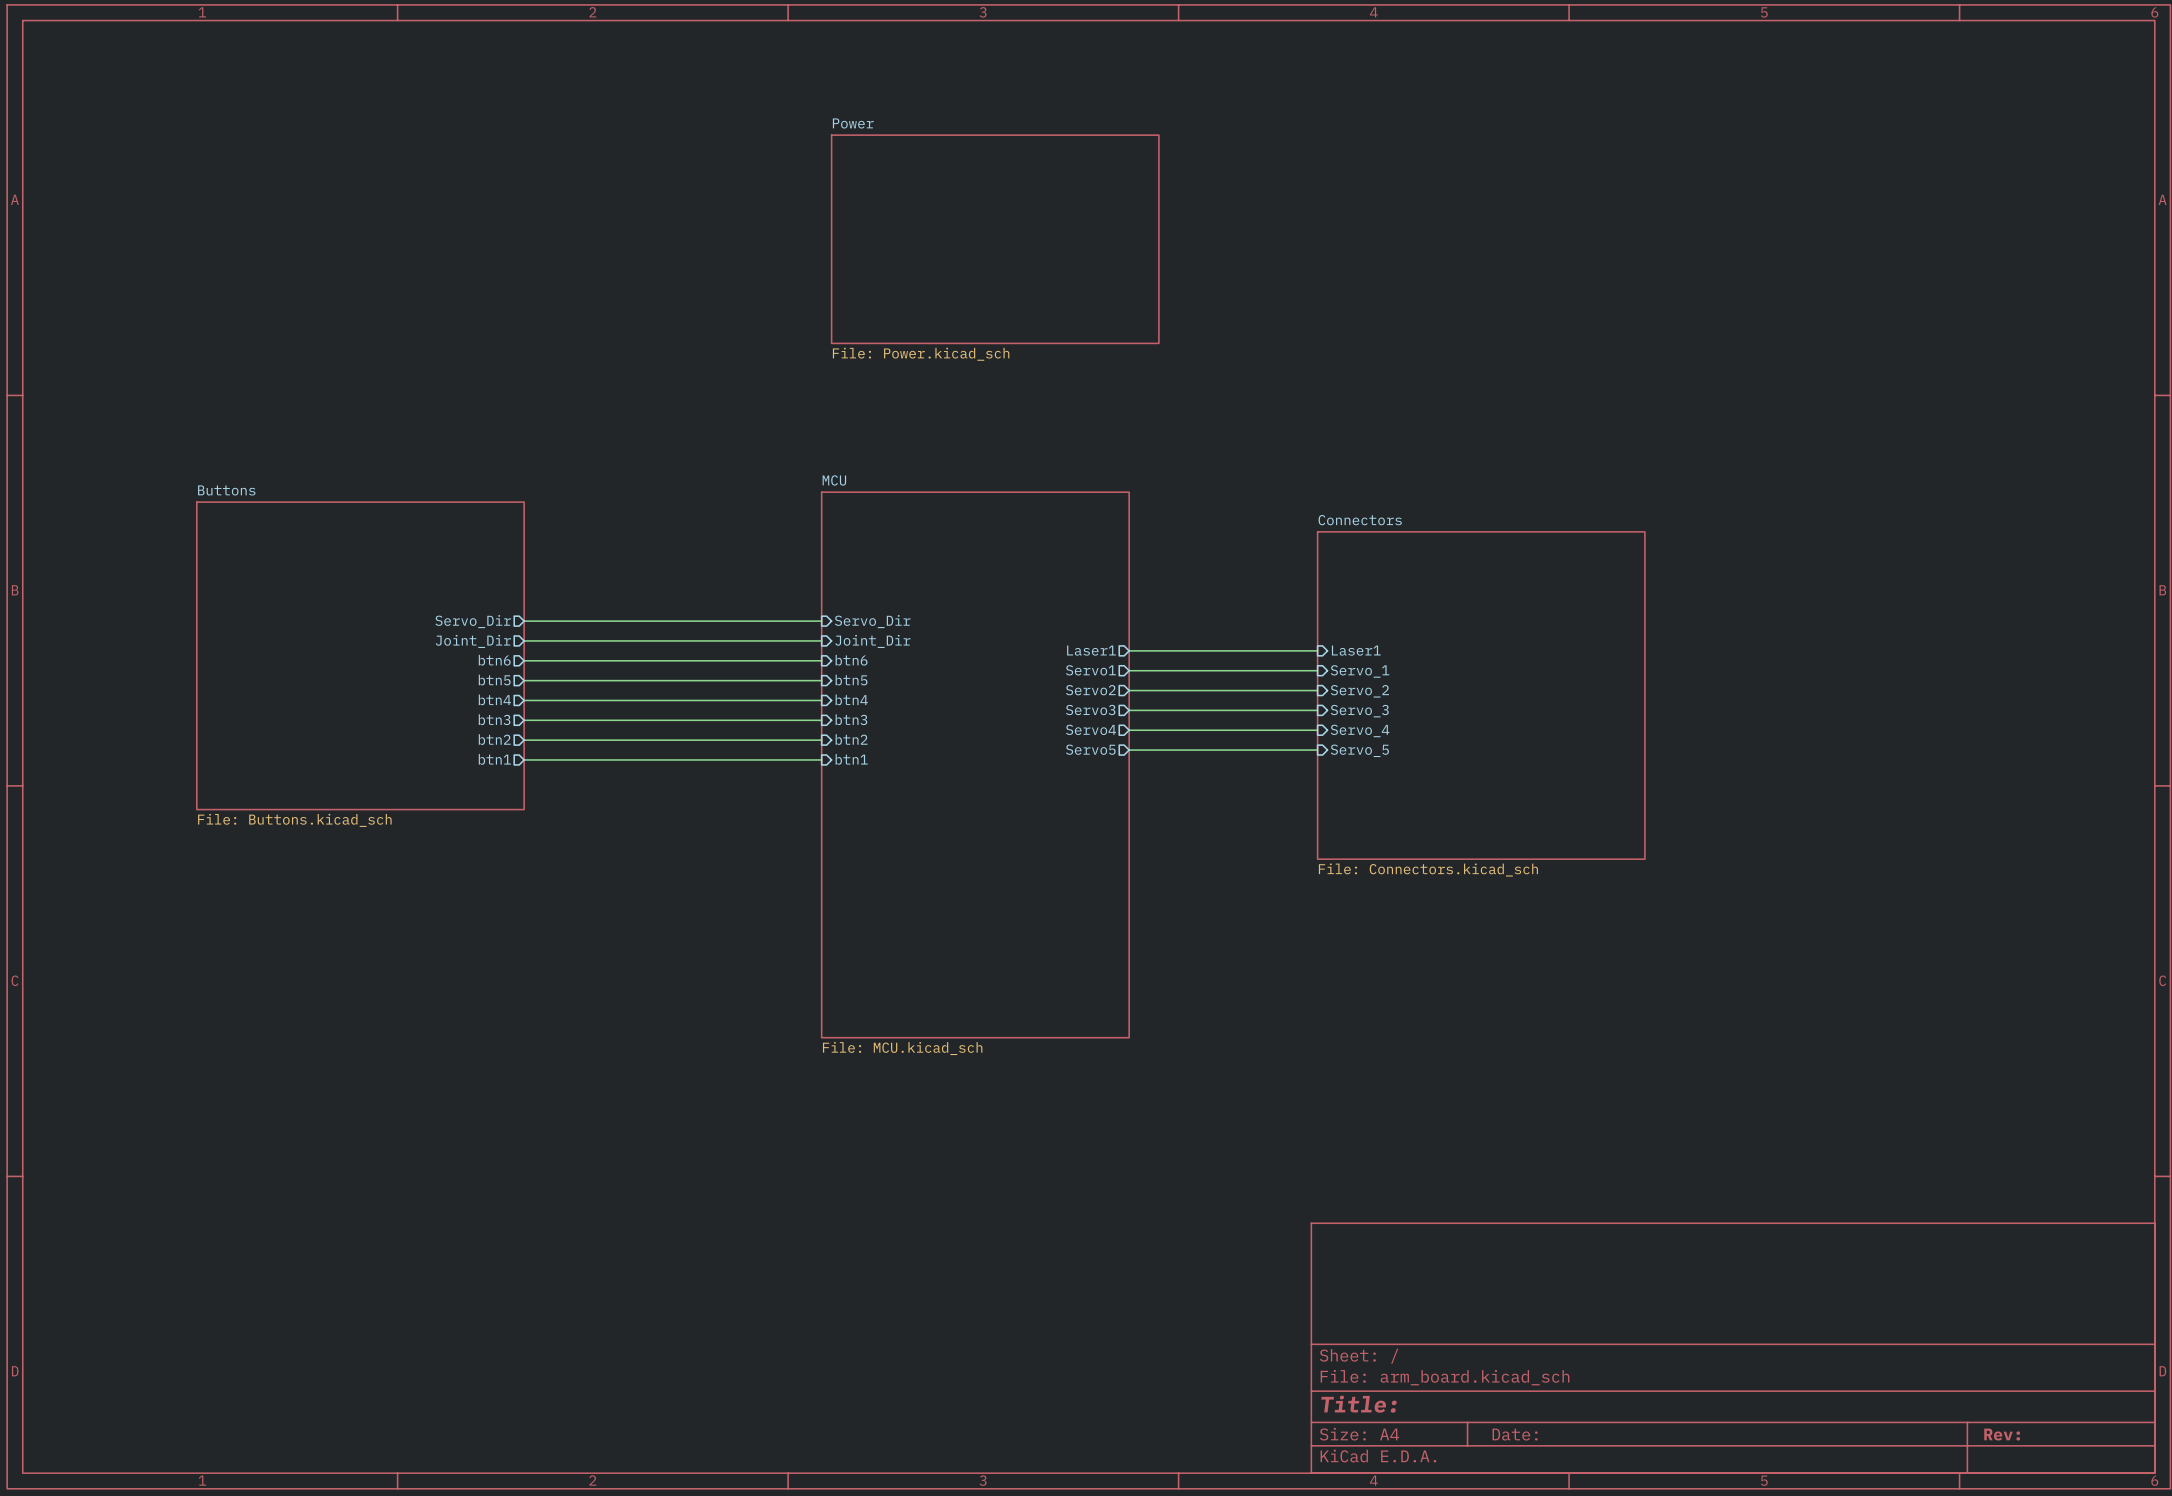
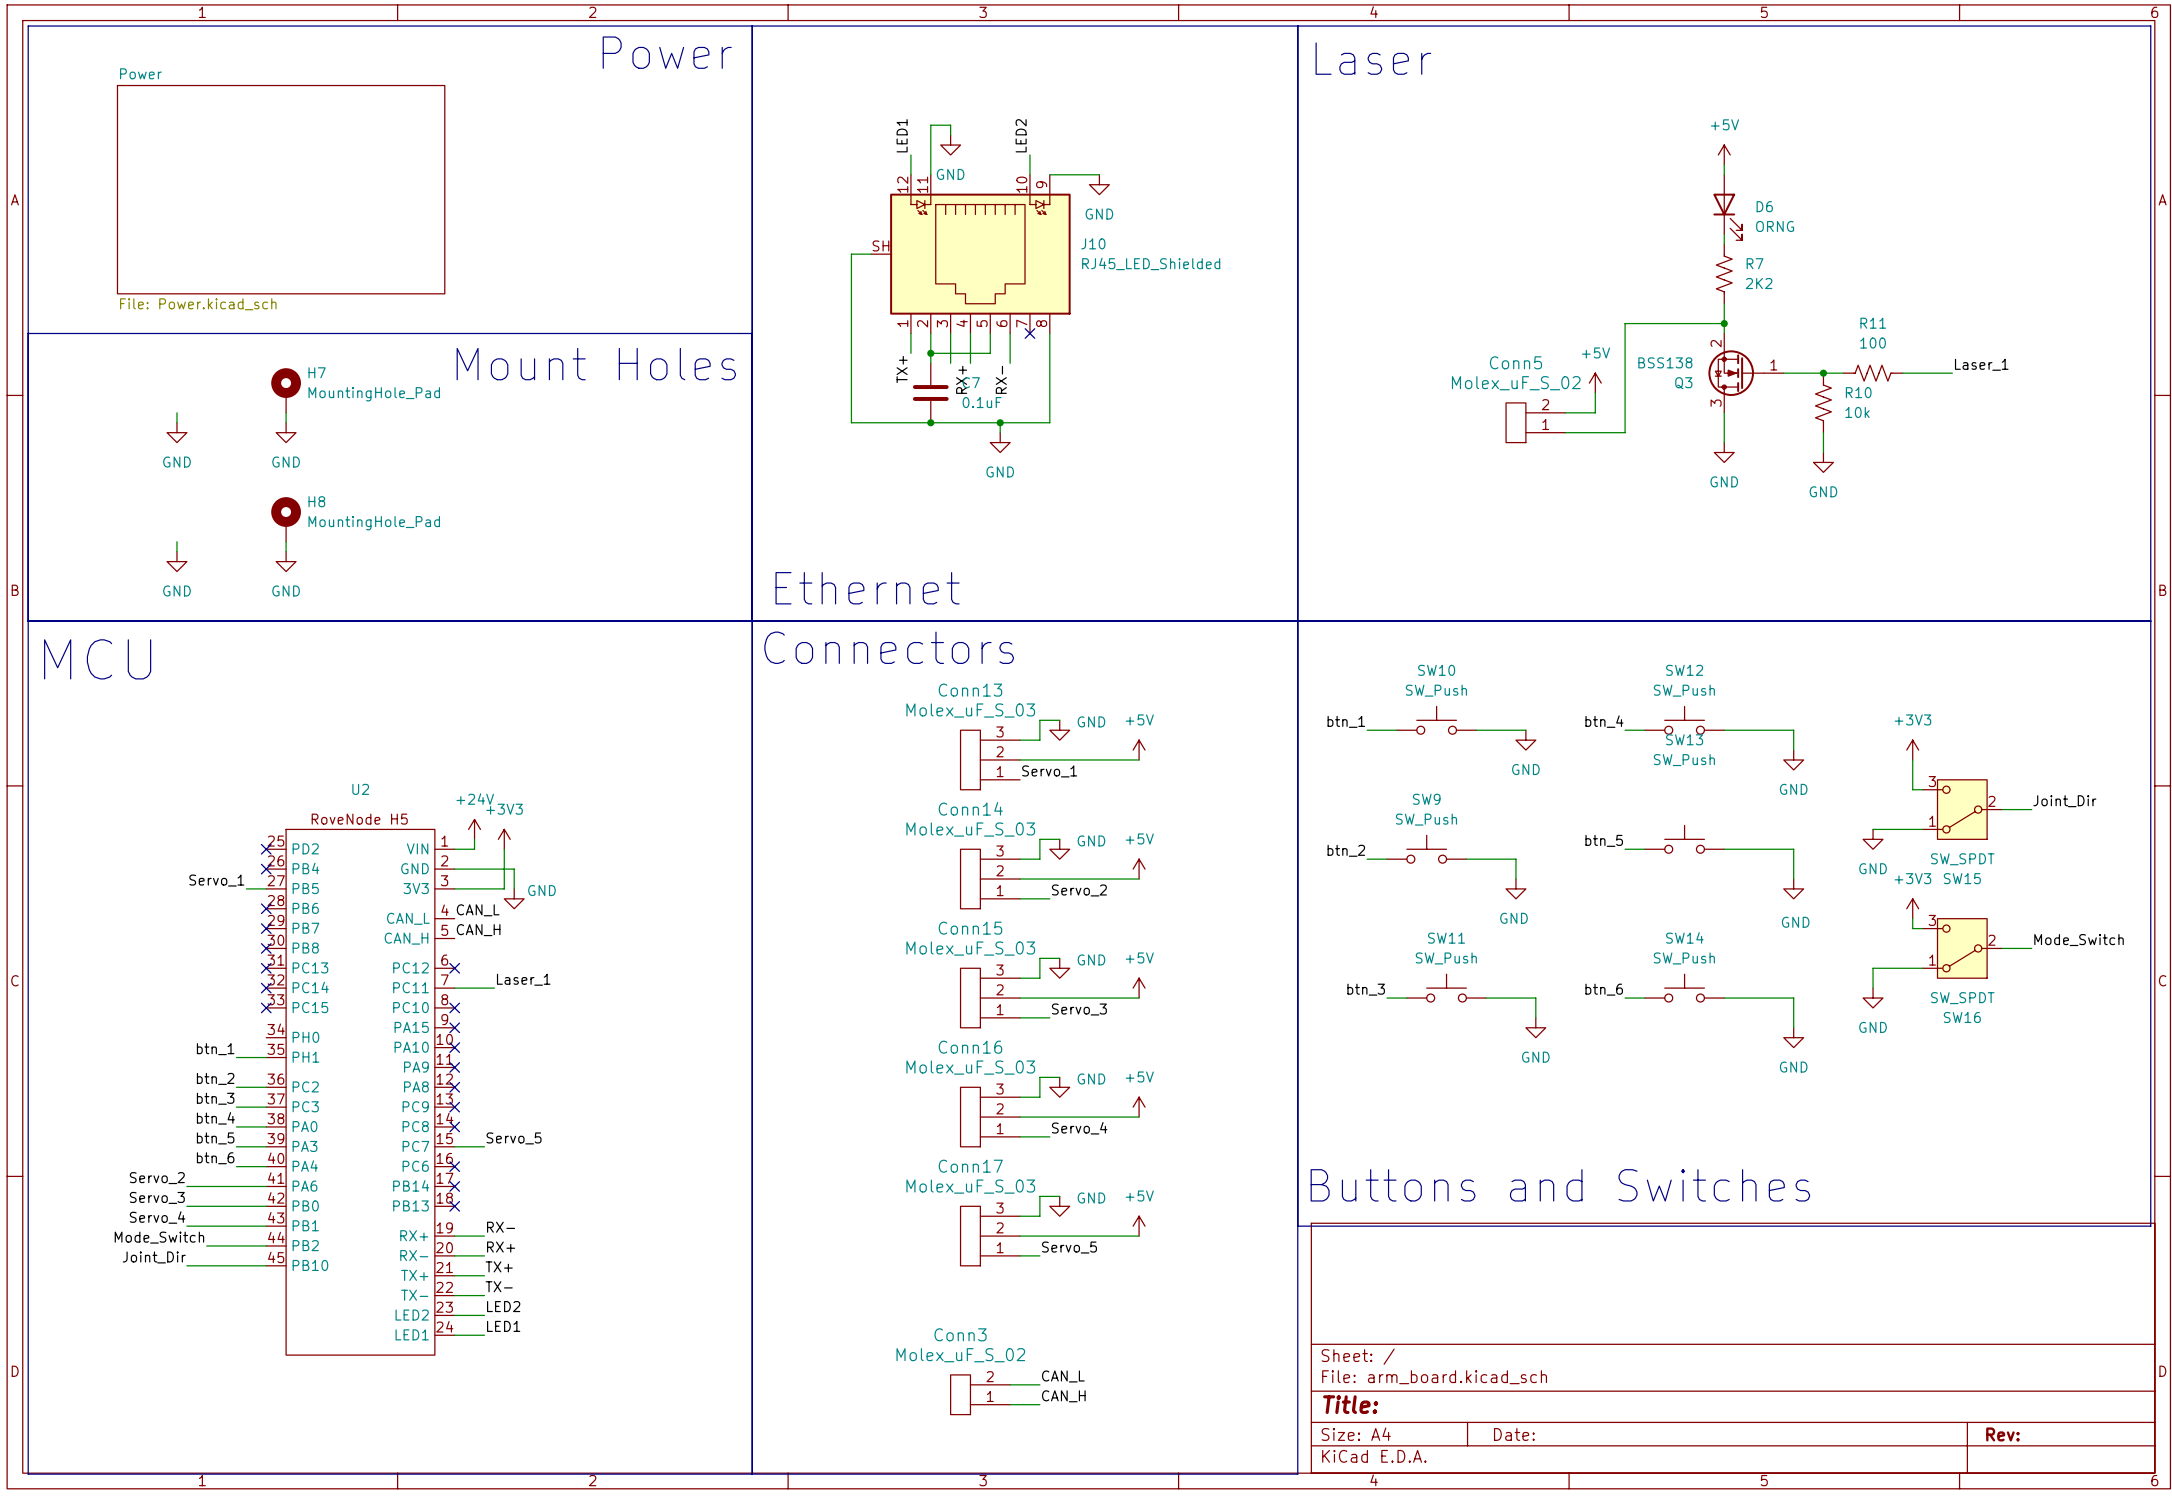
line: none -> (752, 26) (752, 1474)
line: none -> (1297, 26) (1297, 1474) (28, 1474) (28, 26) (2150, 26) (2150, 1226) (1297, 1226)
text: none -> Power (667, 52)
text: none -> Laser (1373, 58)
wire: none -> (950, 135) (950, 125) (930, 125) (930, 174)
label: none -> LED1 (902, 135)
label: none -> LED2 (1021, 135)
power symbol: none -> GND (950, 145)
wire: none -> (910, 154) (910, 174)
wire: none -> (1029, 154) (1029, 174)
power symbol: none -> +5V (1724, 154)
wire: none -> (1724, 164) (1724, 174)
wire: none -> (1049, 174) (1099, 174)
power symbol: none -> GND (1099, 184)
sheet Power: none -> File: Power.kicad_sch (281, 189)
D6: none -> ORNG (1727, 207)
wire: none -> (1724, 234) (1724, 244)
sheet Power: File: Power.kicad_sch (995, 239) -> none
wire: none -> (871, 254) (851, 254) (851, 422) (1049, 422) (1049, 333)
J10: none -> RJ45_LED_Shielded (970, 254)
R7: none -> 2K2 (1724, 273)
wire: none -> (1724, 303) (1724, 333)
wire: none -> (1724, 323) (1625, 323) (1625, 432) (1565, 432)
junction: none -> (1724, 323)
line: none -> (28, 333) (752, 333)
wire: none -> (910, 333) (910, 353)
wire: none -> (930, 333) (930, 363)
wire: none -> (950, 333) (950, 363)
wire: none -> (970, 333) (970, 363)
wire: none -> (990, 333) (990, 353) (930, 353)
wire: none -> (1010, 333) (1010, 363)
no-connect mark: none -> (1029, 333)
junction: none -> (930, 353)
text: none -> Mount Holes (596, 364)
label: none -> Laser_1 (1981, 364)
label: none -> TX+ (902, 369)
Q3: none -> BSS138 (1746, 373)
wire: none -> (1783, 373) (1843, 373)
junction: none -> (1823, 373)
R11: none -> 100 (1873, 373)
wire: none -> (1902, 373) (1952, 373)
label: none -> RX+ (961, 379)
label: none -> RX- (1001, 379)
power symbol: none -> +5V (1595, 383)
H7: none -> MountingHole_Pad (286, 390)
C7: none -> 0.1uF (930, 393)
wire: none -> (1595, 393) (1595, 412) (1565, 412)
R10: none -> 10k (1823, 402)
wire: none -> (176, 412) (176, 422)
wire: none -> (286, 412) (286, 422)
wire: none -> (1724, 412) (1724, 442)
junction: none -> (930, 422)
wire: none -> (1000, 422) (1000, 432)
junction: none -> (1000, 422)
Conn5: none -> Molex_uF_S_02 (1535, 422)
power symbol: none -> GND (176, 432)
power symbol: none -> GND (286, 432)
wire: none -> (1823, 432) (1823, 452)
power symbol: none -> GND (1000, 442)
power symbol: none -> GND (1724, 452)
power symbol: none -> GND (1823, 462)
H8: none -> MountingHole_Pad (286, 519)
wire: none -> (176, 541) (176, 551)
wire: none -> (286, 541) (286, 551)
power symbol: none -> GND (176, 561)
power symbol: none -> GND (286, 561)
text: none -> Ethernet (867, 588)
line: none -> (28, 621) (2150, 621)
sheet pin: Servo_Dir (473, 621) -> none
sheet pin: Servo_Dir (872, 621) -> none
wire: (524, 640) (821, 640) -> none
sheet pin: Joint_Dir (473, 641) -> none
sheet pin: Joint_Dir (872, 641) -> none
text: none -> Connectors (889, 647)
sheet pin: Laser1 (1091, 650) -> none
wire: (1129, 650) (1317, 650) -> none
sheet pin: Laser1 (1356, 650) -> none
sheet Buttons: File: Buttons.kicad_sch (360, 655) -> none
text: none -> MCU (97, 659)
sheet pin: btn6 (494, 660) -> none
wire: (524, 660) (821, 660) -> none
sheet pin: btn6 (851, 660) -> none
sheet pin: Servo1 (1090, 670) -> none
wire: (1129, 670) (1317, 670) -> none
sheet pin: Servo_1 (1360, 671) -> none
sheet pin: btn5 (494, 680) -> none
wire: (524, 680) (821, 680) -> none
sheet pin: btn5 (851, 680) -> none
sheet pin: Servo2 (1090, 690) -> none
wire: (1129, 690) (1317, 690) -> none
sheet pin: Servo_2 (1359, 691) -> none
sheet Connectors: File: Connectors.kicad_sch (1481, 695) -> none
sheet pin: btn4 (494, 699) -> none
sheet pin: btn4 (851, 699) -> none
wire: (524, 700) (821, 700) -> none
sheet pin: Servo3 (1090, 710) -> none
wire: (1129, 710) (1317, 710) -> none
sheet pin: Servo_3 (1359, 711) -> none
sheet pin: btn3 (494, 719) -> none
sheet pin: btn3 (851, 719) -> none
wire: (524, 720) (821, 720) -> none
wire: none -> (1059, 720) (1039, 720) (1039, 740) (1020, 740)
SW10: none -> SW_Push (1436, 720)
SW12: none -> SW_Push (1684, 720)
label: none -> btn_1 (1346, 721)
label: none -> btn_4 (1604, 721)
sheet pin: Servo4 (1091, 729) -> none
power symbol: none -> GND (1059, 730)
wire: (1129, 730) (1317, 730) -> none
sheet pin: Servo_4 (1360, 730) -> none
wire: none -> (1367, 730) (1396, 730)
wire: none -> (1476, 730) (1525, 730)
wire: none -> (1625, 730) (1644, 730)
wire: none -> (1724, 730) (1793, 730) (1793, 750)
sheet pin: btn2 (494, 739) -> none
sheet pin: btn2 (851, 739) -> none
wire: (524, 740) (821, 740) -> none
power symbol: none -> GND (1525, 740)
sheet pin: Servo5 (1090, 749) -> none
wire: (1129, 750) (1317, 750) -> none
power symbol: none -> +5V (1139, 750)
sheet pin: Servo_5 (1359, 750) -> none
power symbol: none -> +3V3 (1912, 750)
sheet pin: btn1 (494, 759) -> none
wire: (524, 759) (821, 759) -> none
sheet pin: btn1 (851, 759) -> none
Conn13: none -> Molex_uF_S_03 (990, 759)
wire: none -> (1020, 759) (1139, 759)
power symbol: none -> GND (1793, 759)
wire: none -> (1912, 759) (1912, 789) (1922, 789)
sheet MCU: File: MCU.kicad_sch (975, 764) -> none
label: none -> Servo_1 (1049, 771)
label: none -> Joint_Dir (2064, 801)
SW15: none -> SW_SPDT (1962, 809)
wire: none -> (2001, 809) (2031, 809)
power symbol: none -> +24V (474, 829)
wire: none -> (1873, 829) (1922, 829)
wire: none -> (474, 839) (474, 849) (454, 849)
power symbol: none -> +3V3 (504, 839)
wire: none -> (1059, 839) (1039, 839) (1039, 859) (1020, 859)
SW13: none -> SW_Push (1684, 839)
power symbol: none -> GND (1873, 839)
label: none -> btn_5 (1604, 840)
no-connect mark: none -> (266, 849)
wire: none -> (504, 849) (504, 888) (454, 888)
power symbol: none -> GND (1059, 849)
SW9: none -> SW_Push (1426, 849)
wire: none -> (1625, 849) (1644, 849)
wire: none -> (1724, 849) (1793, 849) (1793, 879)
label: none -> btn_2 (1346, 850)
no-connect mark: none -> (266, 869)
wire: none -> (454, 869) (514, 869) (514, 888)
power symbol: none -> +5V (1139, 869)
Conn14: none -> Molex_uF_S_03 (990, 879)
wire: none -> (1020, 879) (1139, 879)
label: none -> Servo_1 (216, 880)
wire: none -> (246, 888) (266, 888)
power symbol: none -> GND (1515, 888)
power symbol: none -> GND (1793, 888)
label: none -> Servo_2 (1079, 890)
power symbol: none -> GND (514, 898)
wire: none -> (1020, 898) (1049, 898)
no-connect mark: none -> (266, 908)
power symbol: none -> +3V3 (1912, 908)
label: none -> CAN_L (478, 910)
wire: none -> (1912, 918) (1912, 928) (1922, 928)
no-connect mark: none -> (266, 928)
label: none -> CAN_H (478, 930)
label: none -> Mode_Switch (2079, 940)
no-connect mark: none -> (266, 948)
SW16: none -> SW_SPDT (1962, 948)
wire: none -> (2001, 948) (2031, 948)
wire: none -> (1059, 958) (1039, 958) (1039, 978) (1020, 978)
no-connect mark: none -> (266, 968)
no-connect mark: none -> (454, 968)
power symbol: none -> GND (1059, 968)
wire: none -> (1922, 968) (1873, 968) (1873, 988)
label: none -> Laser_1 (523, 979)
no-connect mark: none -> (266, 988)
wire: none -> (454, 988) (494, 988)
power symbol: none -> +5V (1139, 988)
SW11: none -> SW_Push (1446, 988)
SW14: none -> SW_Push (1684, 988)
label: none -> btn_3 (1366, 989)
label: none -> btn_6 (1604, 989)
Conn15: none -> Molex_uF_S_03 (990, 998)
wire: none -> (1020, 998) (1139, 998)
wire: none -> (1387, 998) (1406, 998)
wire: none -> (1486, 998) (1535, 998) (1535, 1017)
wire: none -> (1625, 998) (1644, 998)
wire: none -> (1724, 998) (1793, 998) (1793, 1027)
power symbol: none -> GND (1873, 998)
no-connect mark: none -> (266, 1007)
no-connect mark: none -> (454, 1007)
label: none -> Servo_3 (1079, 1009)
wire: none -> (1020, 1017) (1049, 1017)
no-connect mark: none -> (454, 1027)
power symbol: none -> GND (1535, 1027)
power symbol: none -> GND (1793, 1037)
no-connect mark: none -> (454, 1047)
label: none -> btn_1 (215, 1049)
wire: none -> (236, 1057) (266, 1057)
no-connect mark: none -> (454, 1067)
wire: none -> (1059, 1077) (1039, 1077) (1039, 1097) (1020, 1097)
label: none -> btn_2 (215, 1078)
wire: none -> (236, 1087) (266, 1087)
no-connect mark: none -> (454, 1087)
power symbol: none -> GND (1059, 1087)
U2: none -> (360, 1092)
label: none -> btn_3 (215, 1098)
wire: none -> (236, 1107) (266, 1107)
no-connect mark: none -> (454, 1107)
power symbol: none -> +5V (1139, 1107)
Conn16: none -> Molex_uF_S_03 (990, 1117)
wire: none -> (1020, 1117) (1139, 1117)
label: none -> btn_4 (215, 1118)
wire: none -> (236, 1126) (266, 1126)
no-connect mark: none -> (454, 1126)
label: none -> Servo_4 (1079, 1128)
wire: none -> (1020, 1136) (1049, 1136)
label: none -> btn_5 (215, 1138)
label: none -> Servo_5 (514, 1138)
wire: none -> (236, 1146) (266, 1146)
wire: none -> (454, 1146) (484, 1146)
label: none -> btn_6 (215, 1158)
wire: none -> (236, 1166) (266, 1166)
no-connect mark: none -> (454, 1166)
label: none -> Servo_2 (157, 1178)
text: none -> Buttons and Switches (1560, 1185)
wire: none -> (186, 1186) (266, 1186)
no-connect mark: none -> (454, 1186)
wire: none -> (1059, 1196) (1039, 1196) (1039, 1216) (1020, 1216)
label: none -> Servo_3 (157, 1197)
wire: none -> (186, 1206) (266, 1206)
no-connect mark: none -> (454, 1206)
power symbol: none -> GND (1059, 1206)
label: none -> Servo_4 (157, 1217)
wire: none -> (186, 1226) (266, 1226)
power symbol: none -> +5V (1139, 1226)
label: none -> RX- (501, 1227)
wire: none -> (454, 1236) (484, 1236)
Conn17: none -> Molex_uF_S_03 (990, 1236)
wire: none -> (1020, 1236) (1139, 1236)
label: none -> Mode_Switch (159, 1237)
wire: none -> (206, 1245) (266, 1245)
label: none -> RX+ (501, 1247)
label: none -> Servo_5 (1069, 1247)
wire: none -> (454, 1255) (484, 1255)
wire: none -> (1020, 1255) (1039, 1255)
label: none -> Joint_Dir (154, 1257)
wire: none -> (186, 1265) (266, 1265)
label: none -> TX+ (499, 1266)
wire: none -> (454, 1275) (484, 1275)
label: none -> TX- (499, 1286)
wire: none -> (454, 1295) (484, 1295)
label: none -> LED2 (503, 1306)
wire: none -> (454, 1315) (484, 1315)
label: none -> LED1 (503, 1326)
wire: none -> (454, 1335) (484, 1335)
label: none -> CAN_L (1063, 1376)
wire: none -> (1010, 1384) (1039, 1384)
Conn3: none -> Molex_uF_S_02 (980, 1394)
label: none -> CAN_H (1063, 1396)
wire: none -> (1010, 1404) (1039, 1404)

